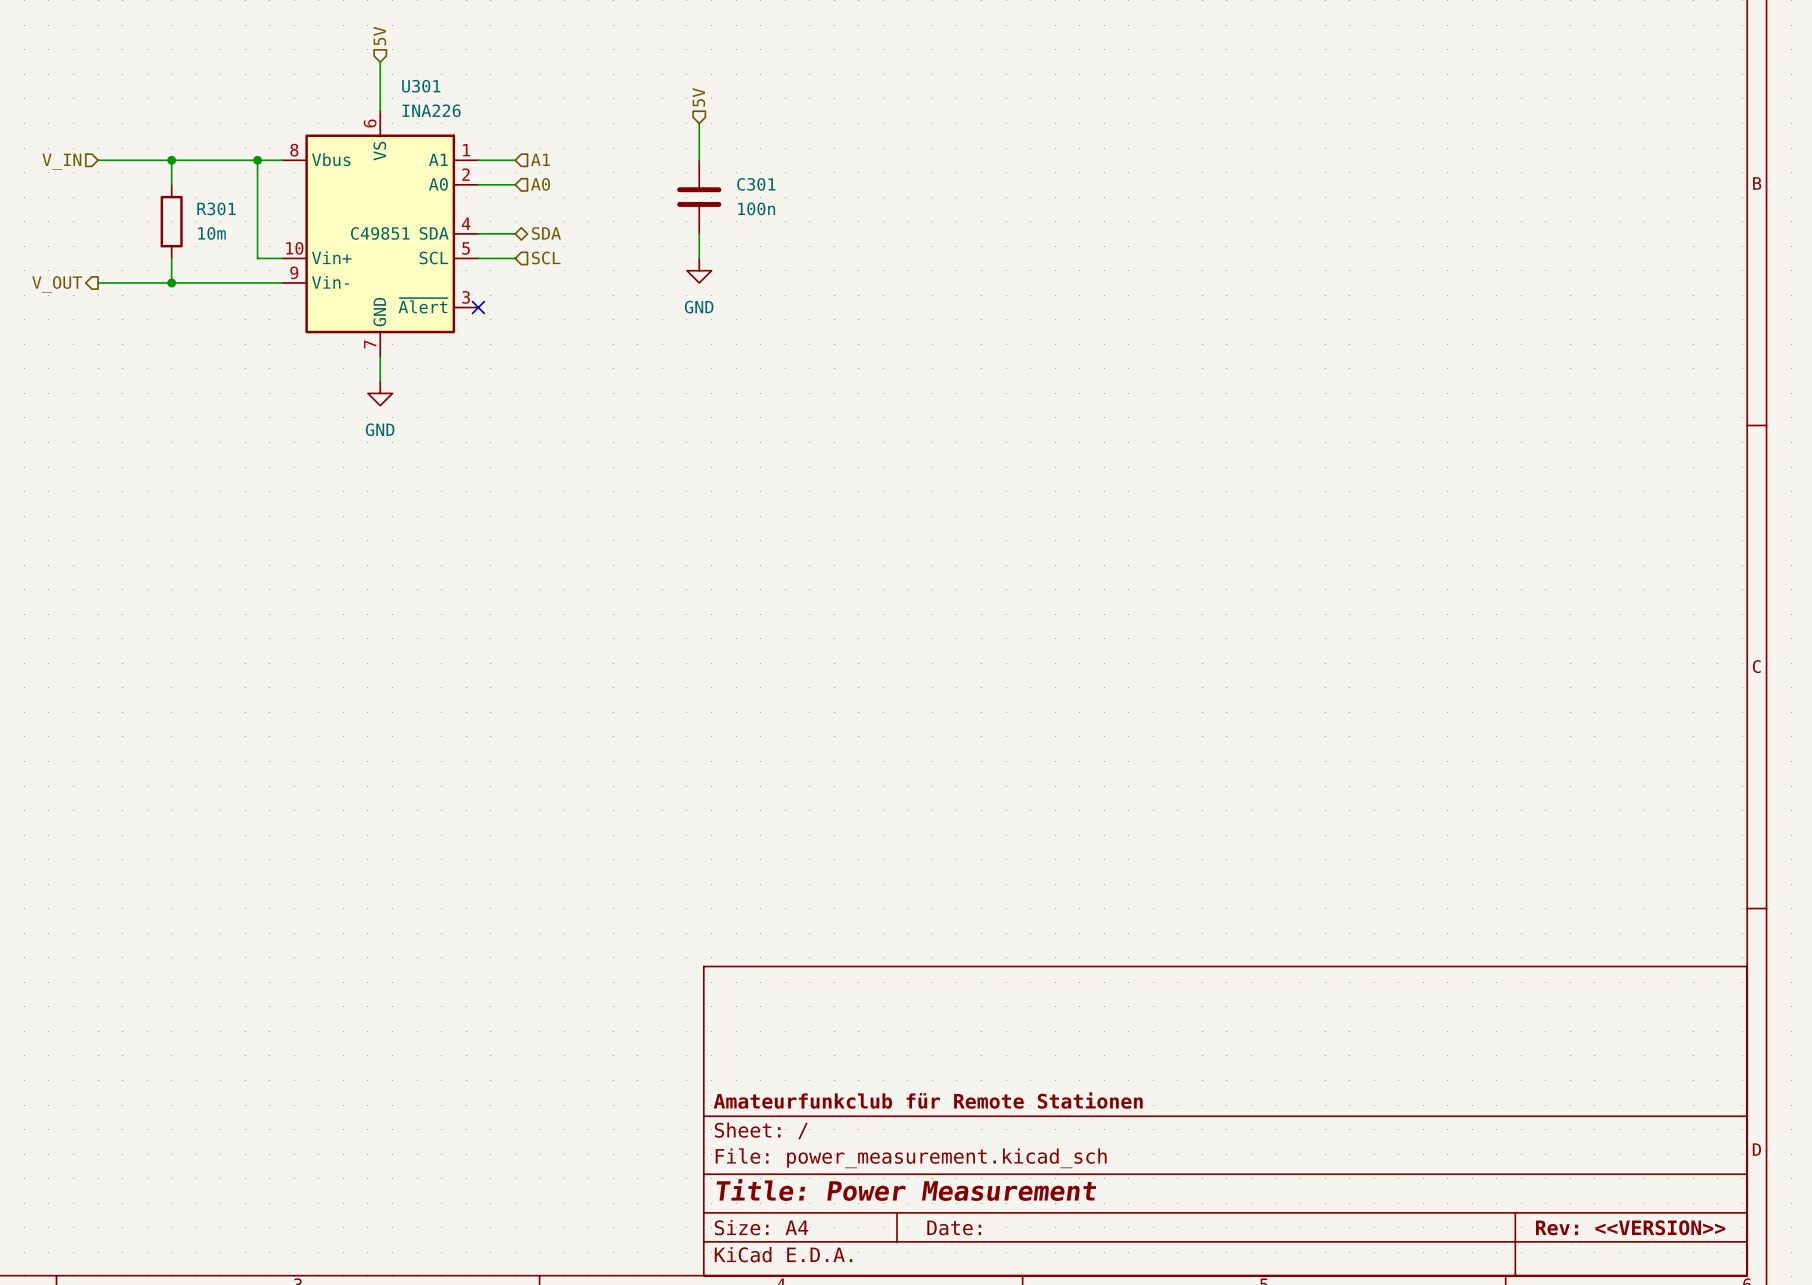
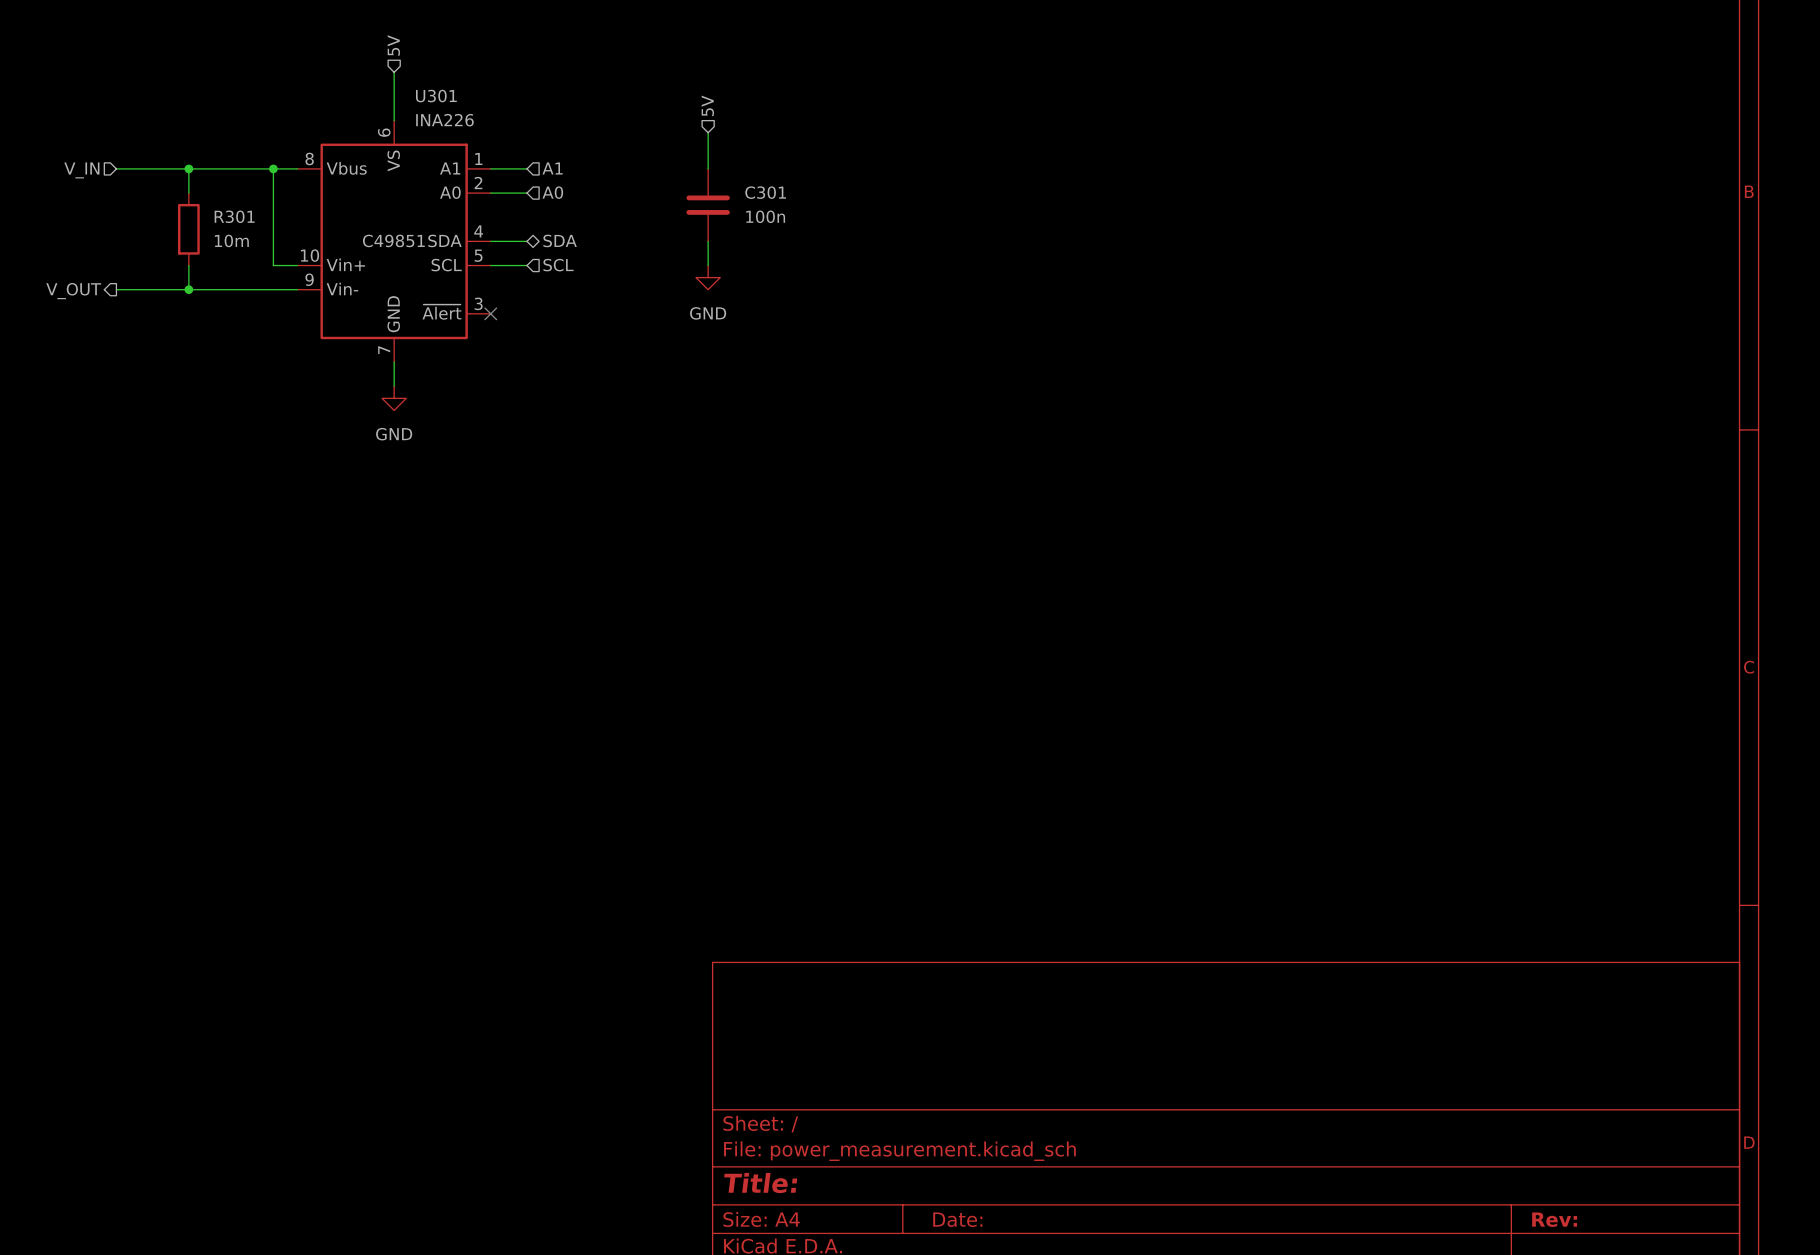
title block: Amateurfunkclub für Remote Stationen (928, 1100) -> none
title block: Title: Power Measurement (906, 1189) -> Title: (760, 1183)
title block: Rev: <<VERSION>> (1630, 1227) -> Rev: (1554, 1219)

